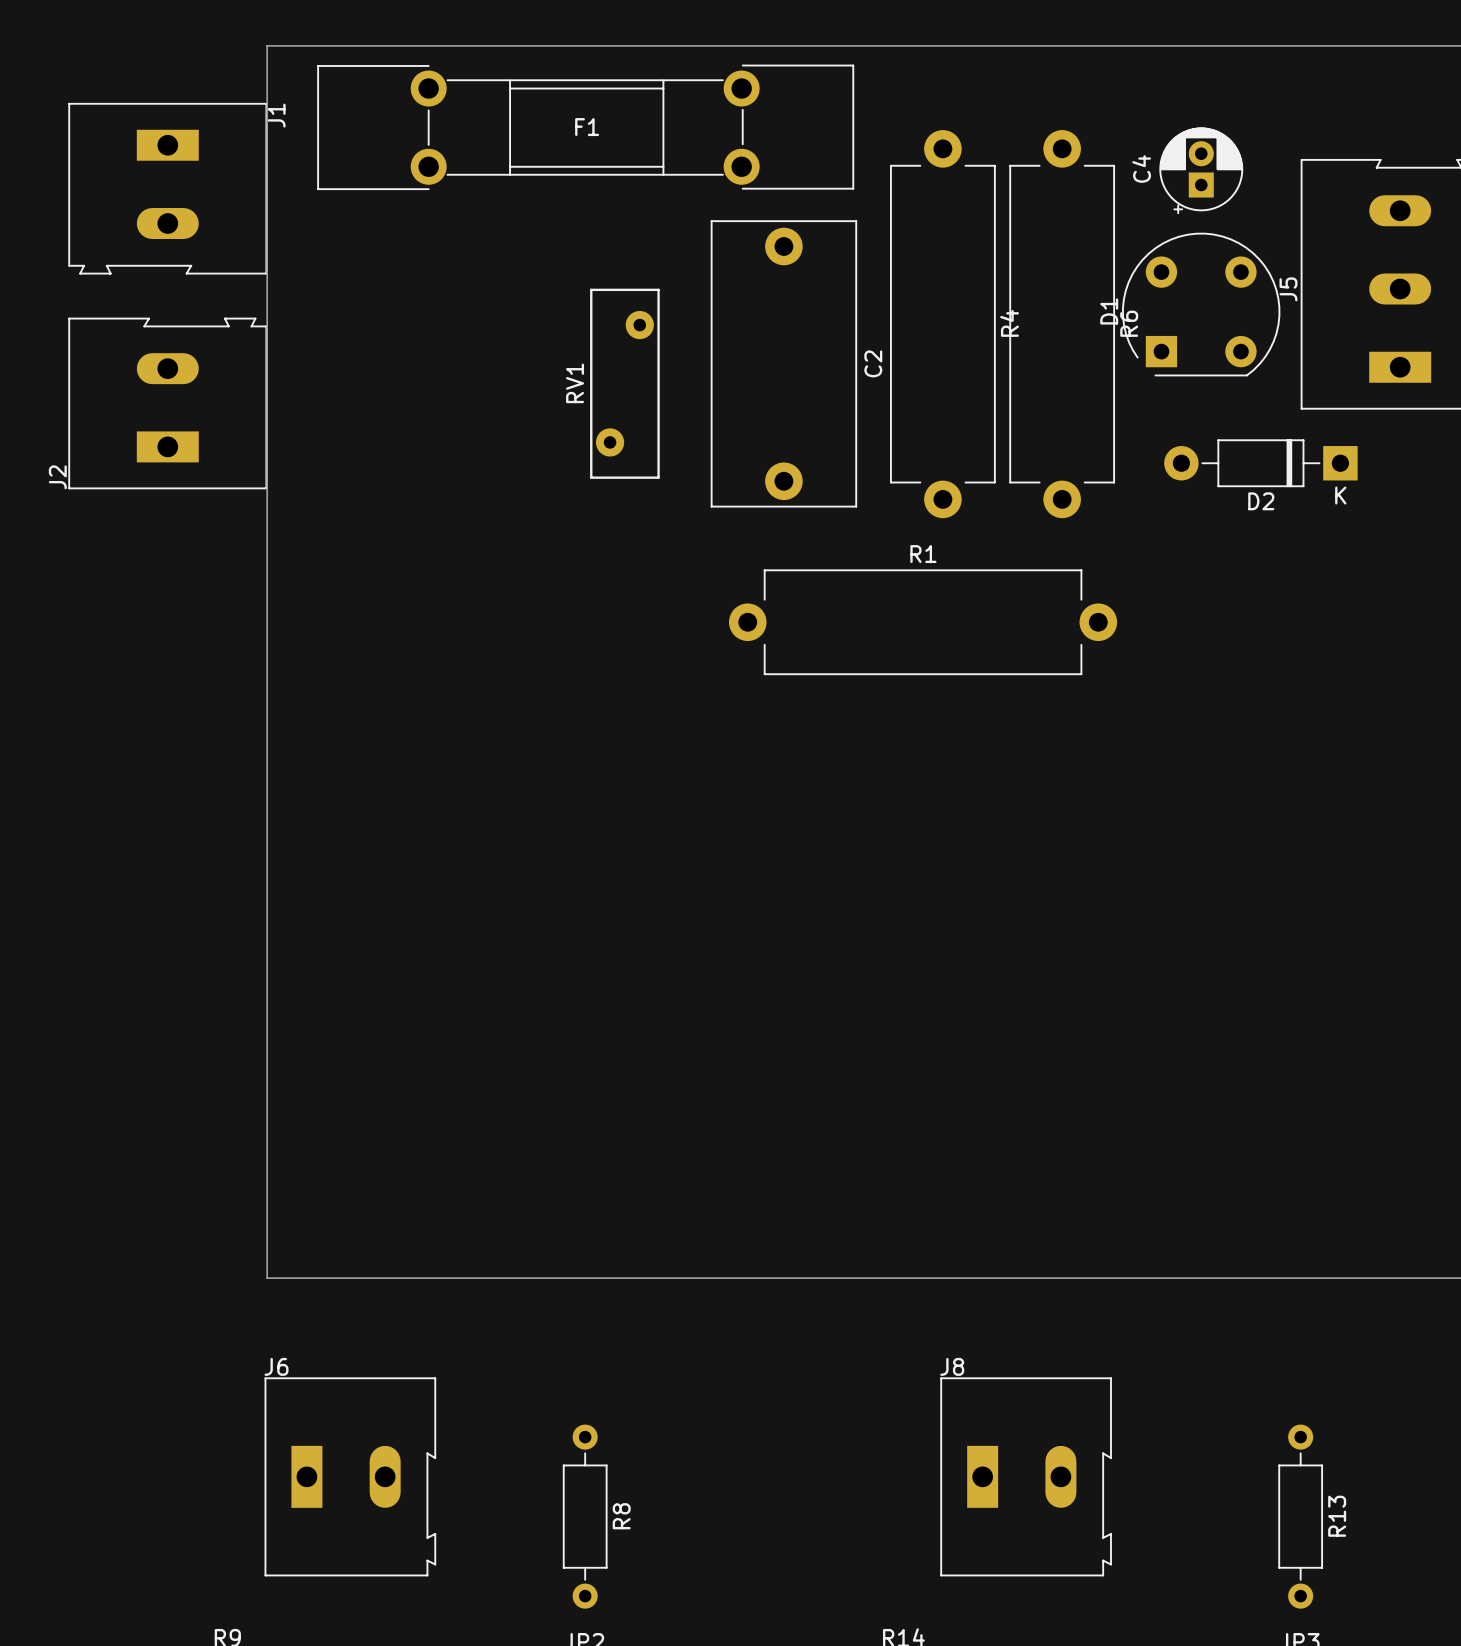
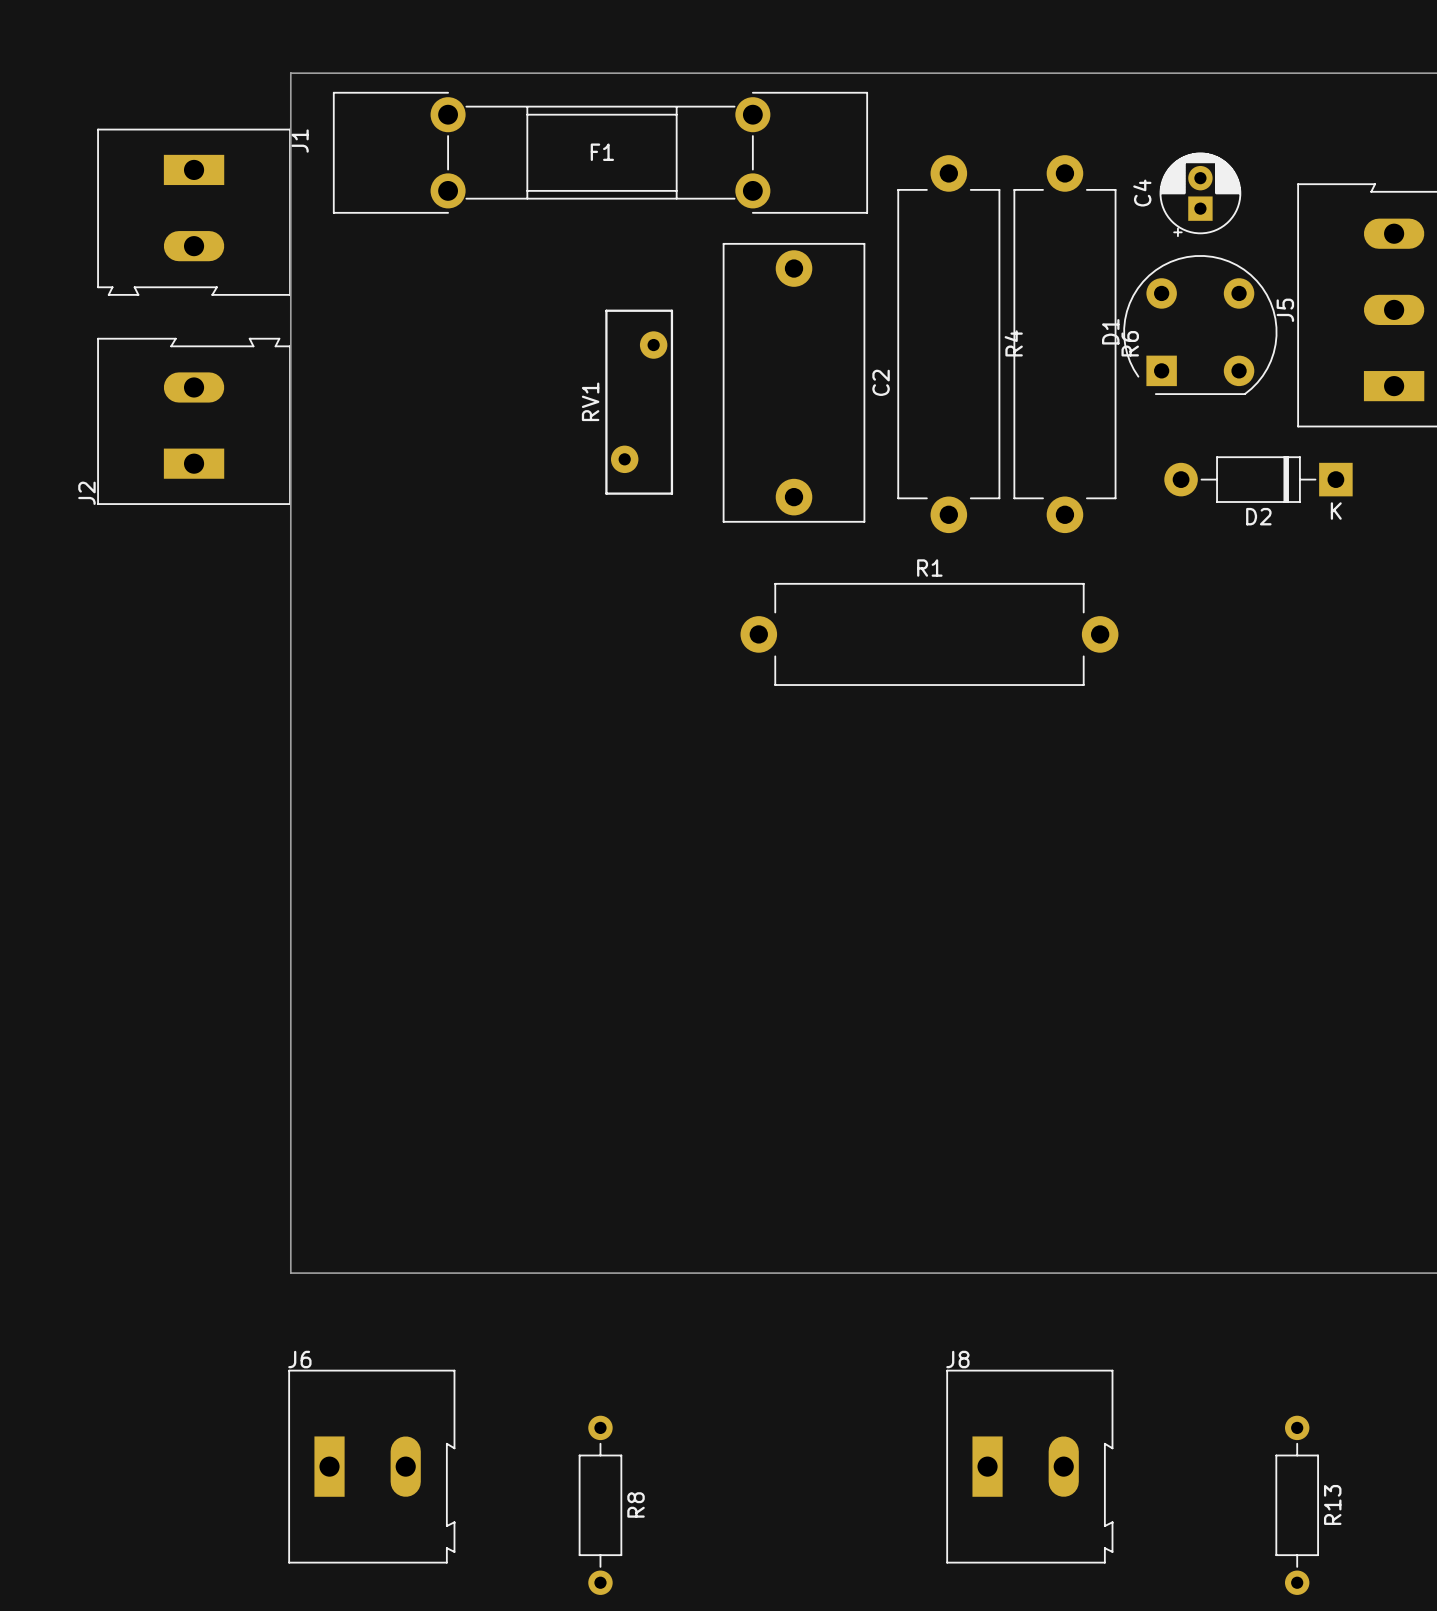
F1 footprint: [317, 64, 855, 191] -> [332, 91, 869, 214]

